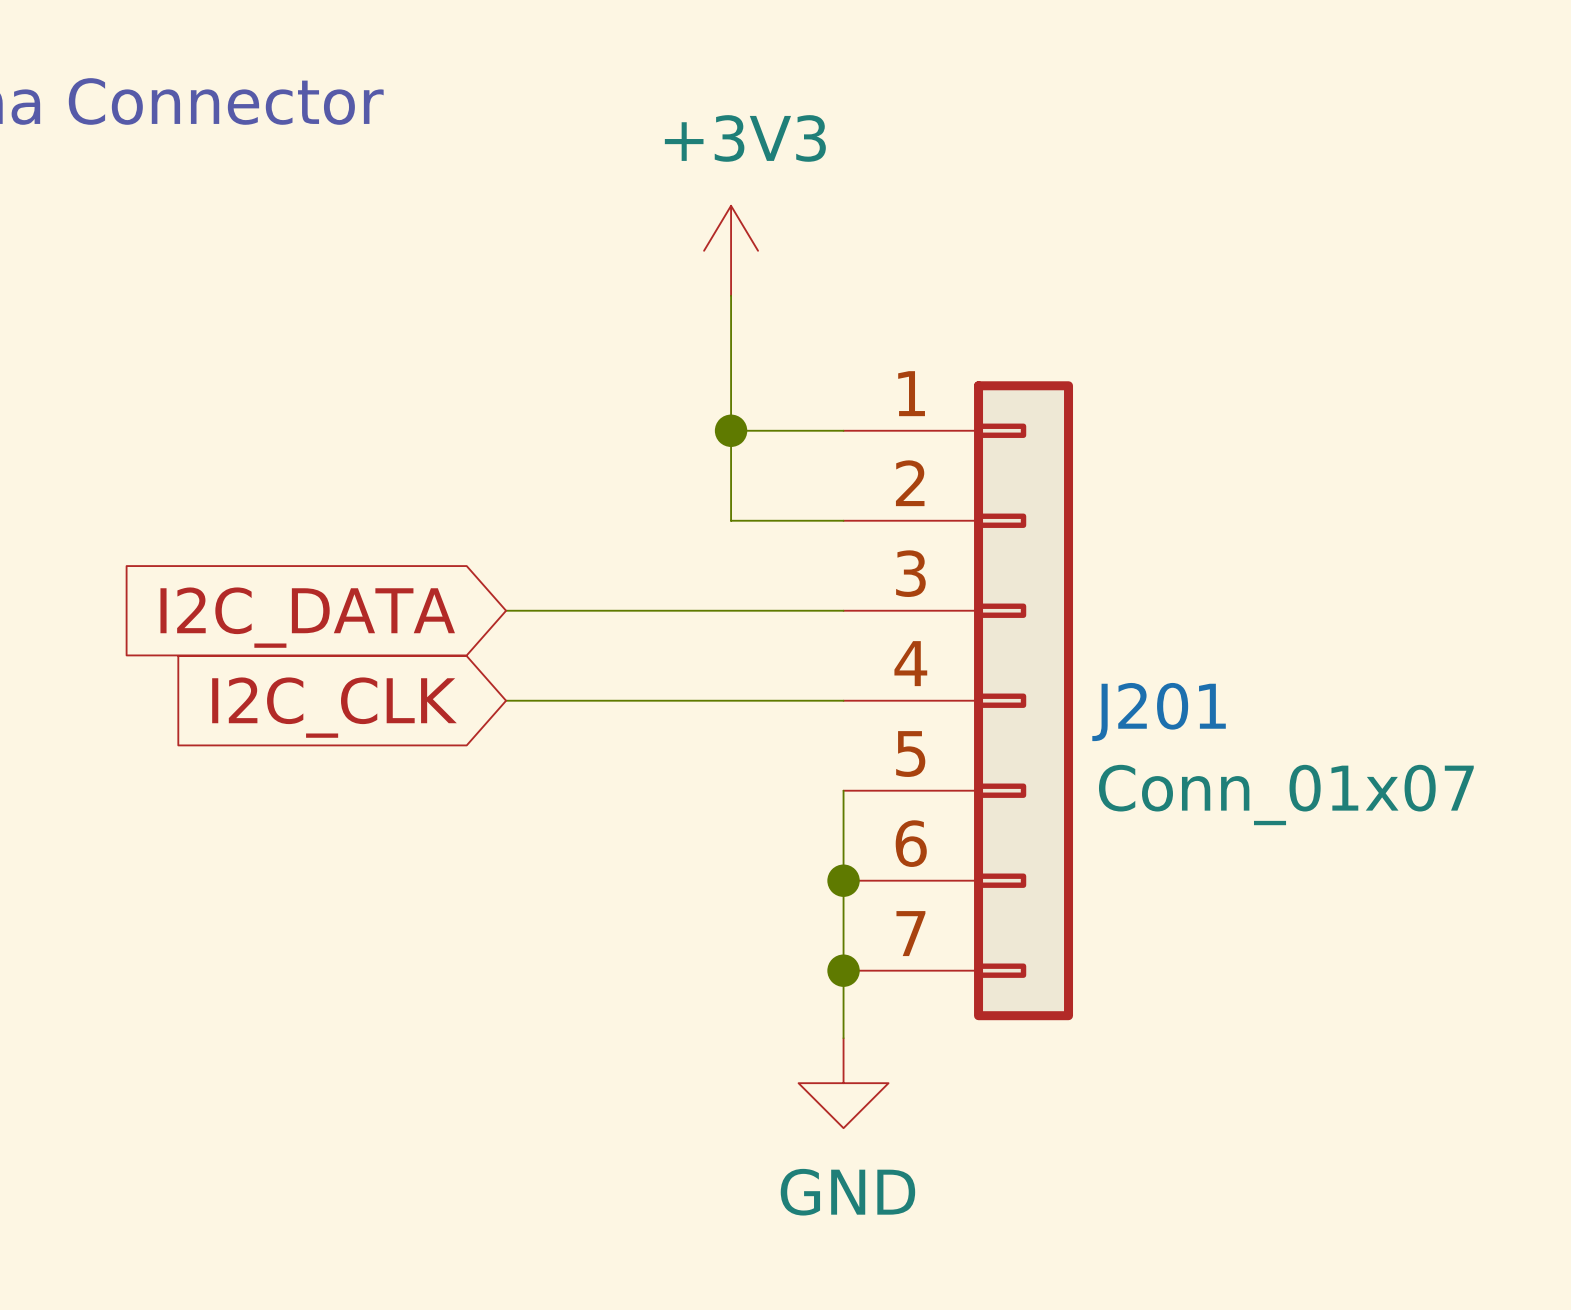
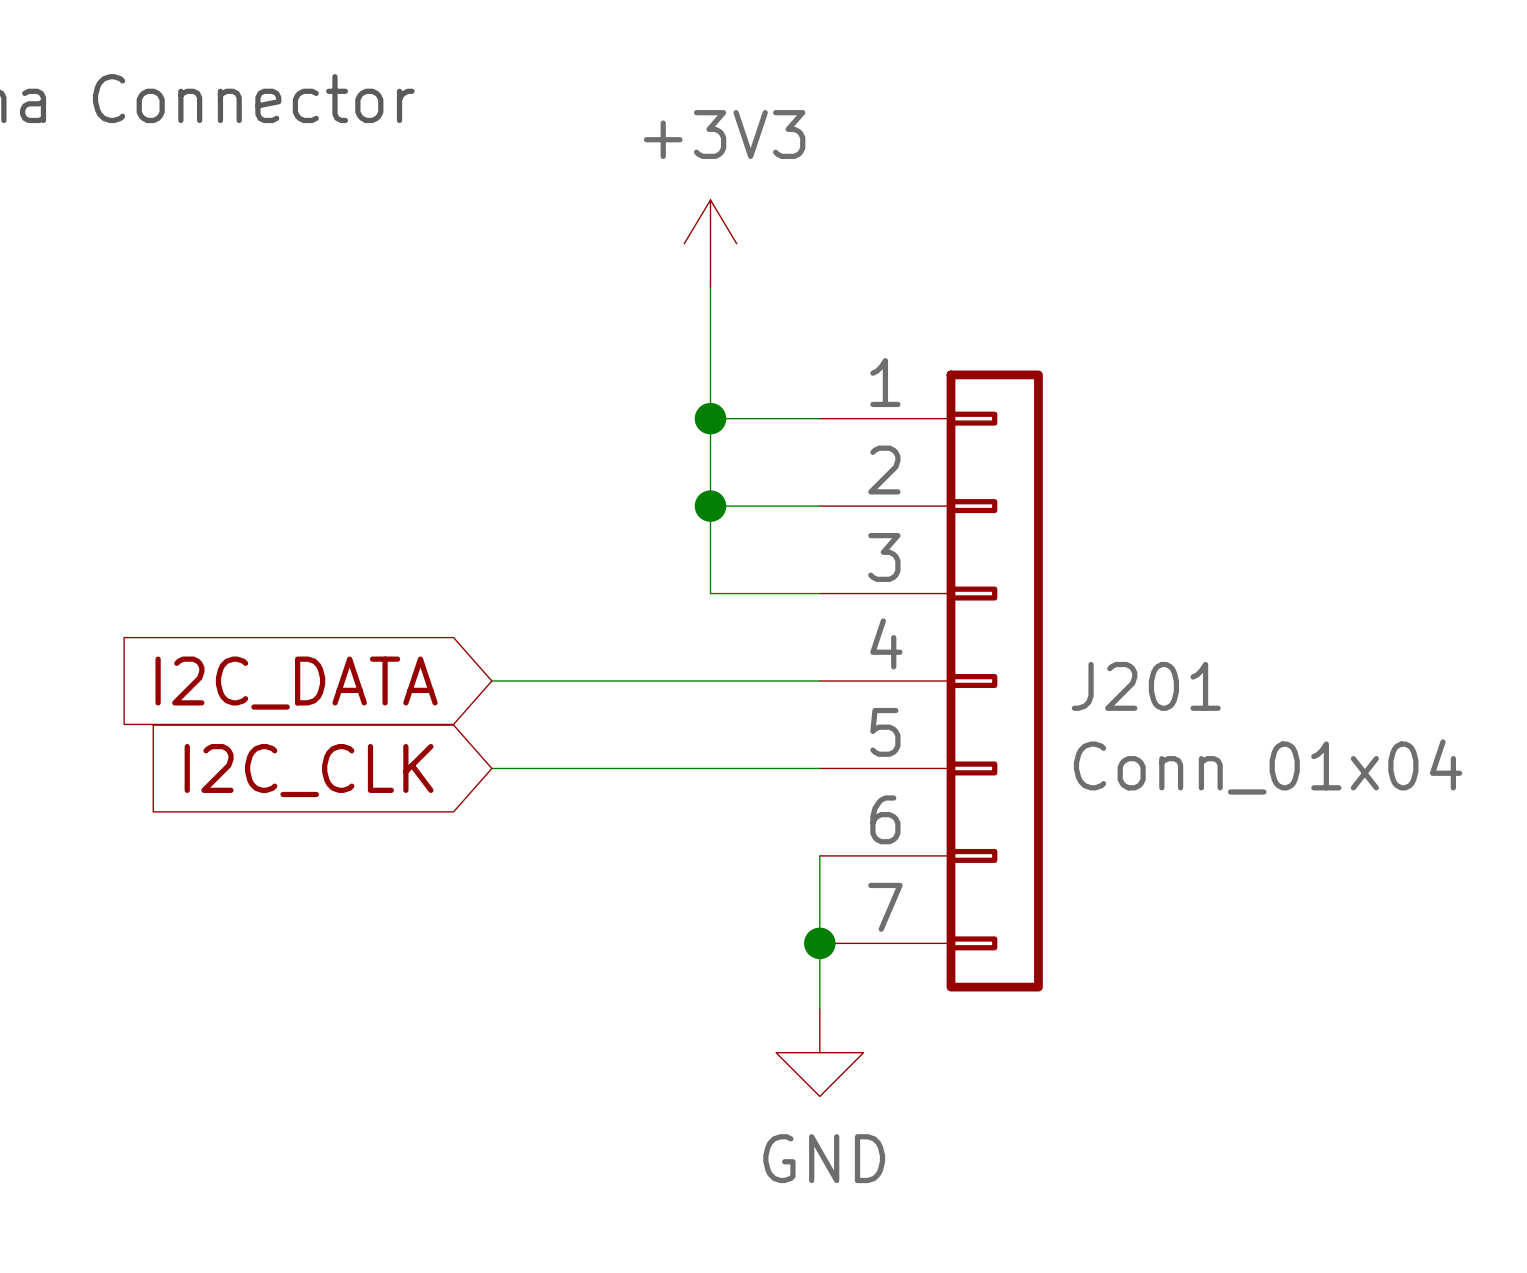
junction: none -> (710, 506)
wire: (506, 610) (731, 610) -> (710, 506) (710, 593)
global label: I2C_DATA (307, 617) -> none
global label: I2C_CLK (334, 707) -> I2C_DATA (296, 683)
wire: (843, 790) (843, 880) -> (819, 768) (491, 768)
J201 value: Conn_01x07 (1286, 795) -> Conn_01x04 (1268, 767)
global label: none -> I2C_CLK (309, 770)
junction: (843, 880) -> none

